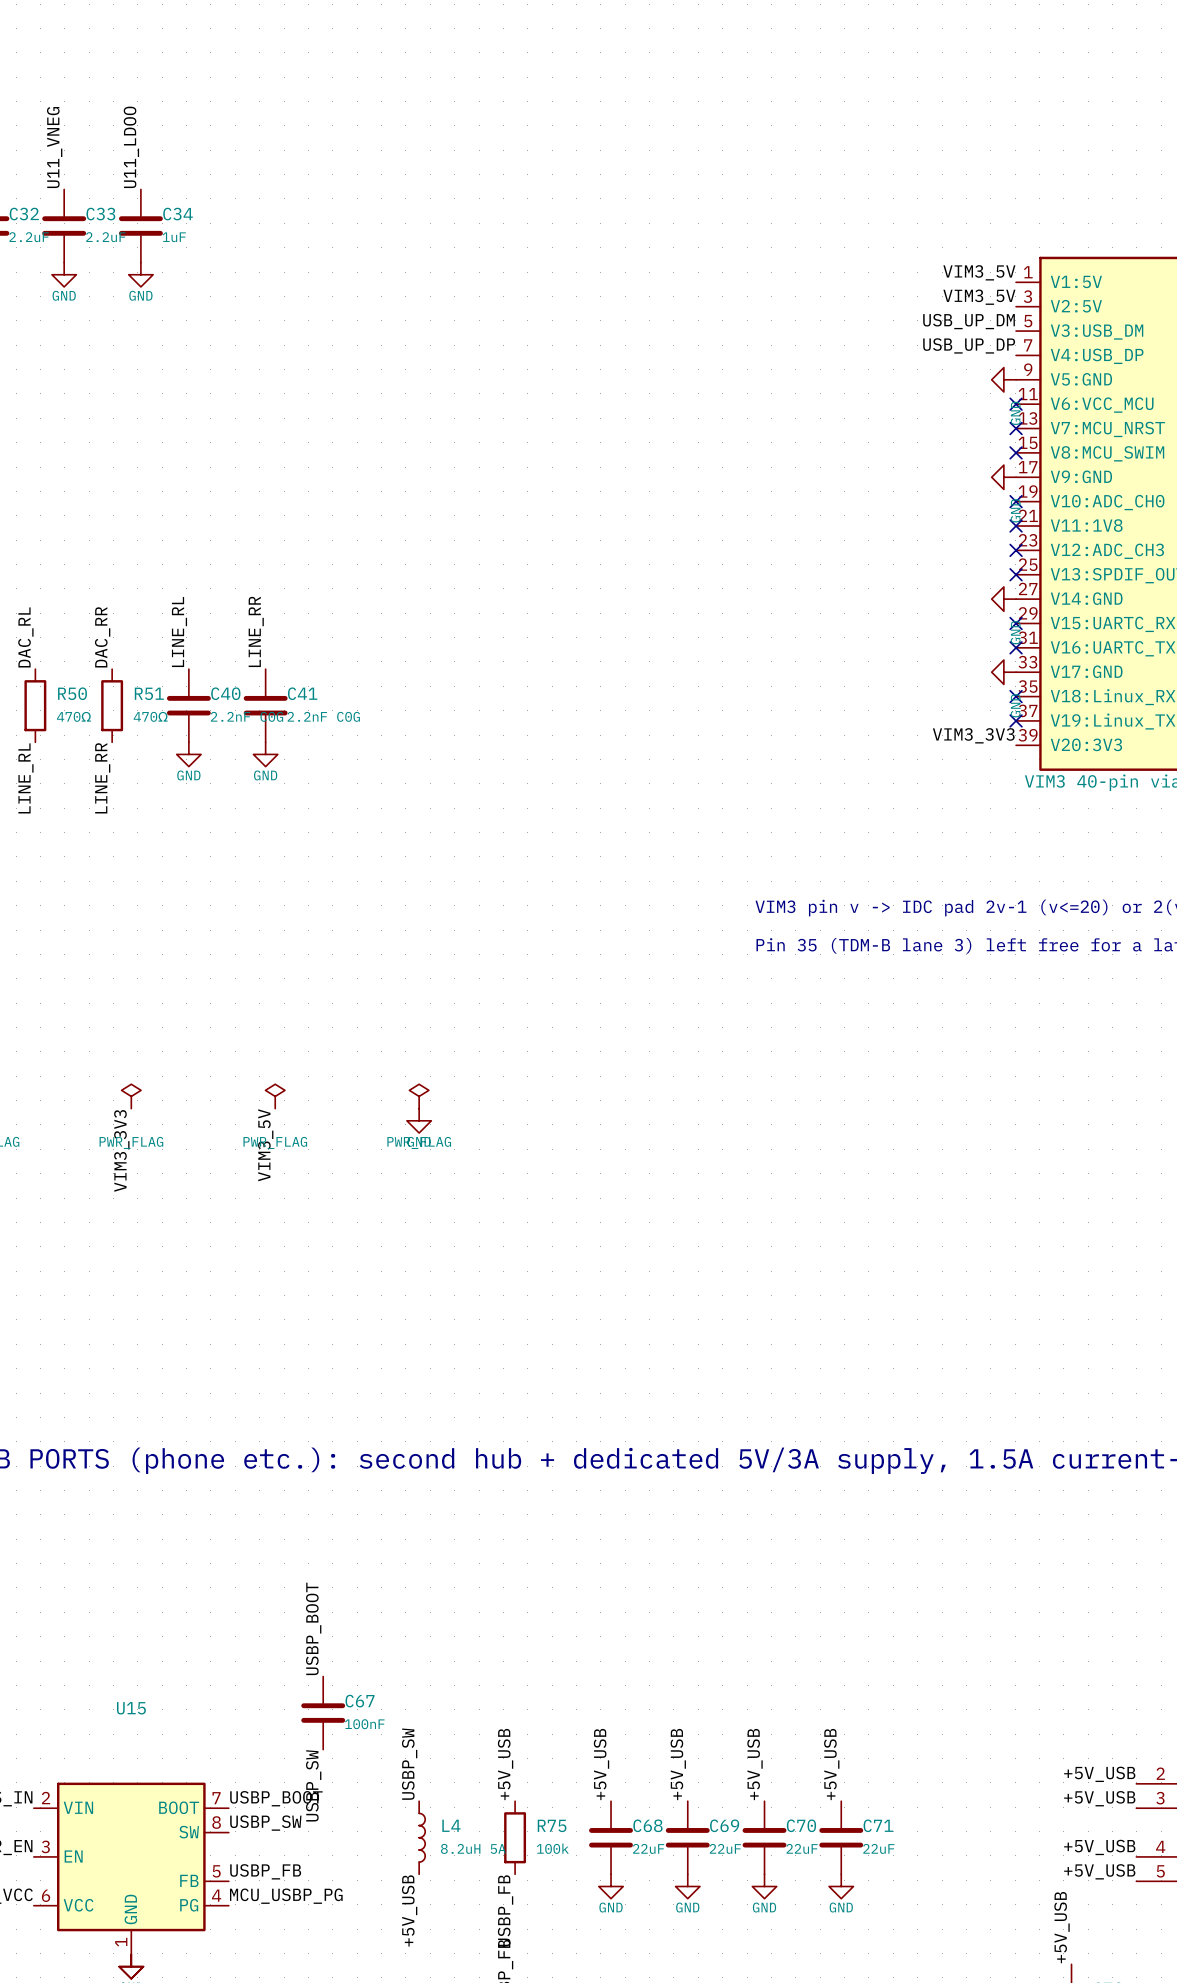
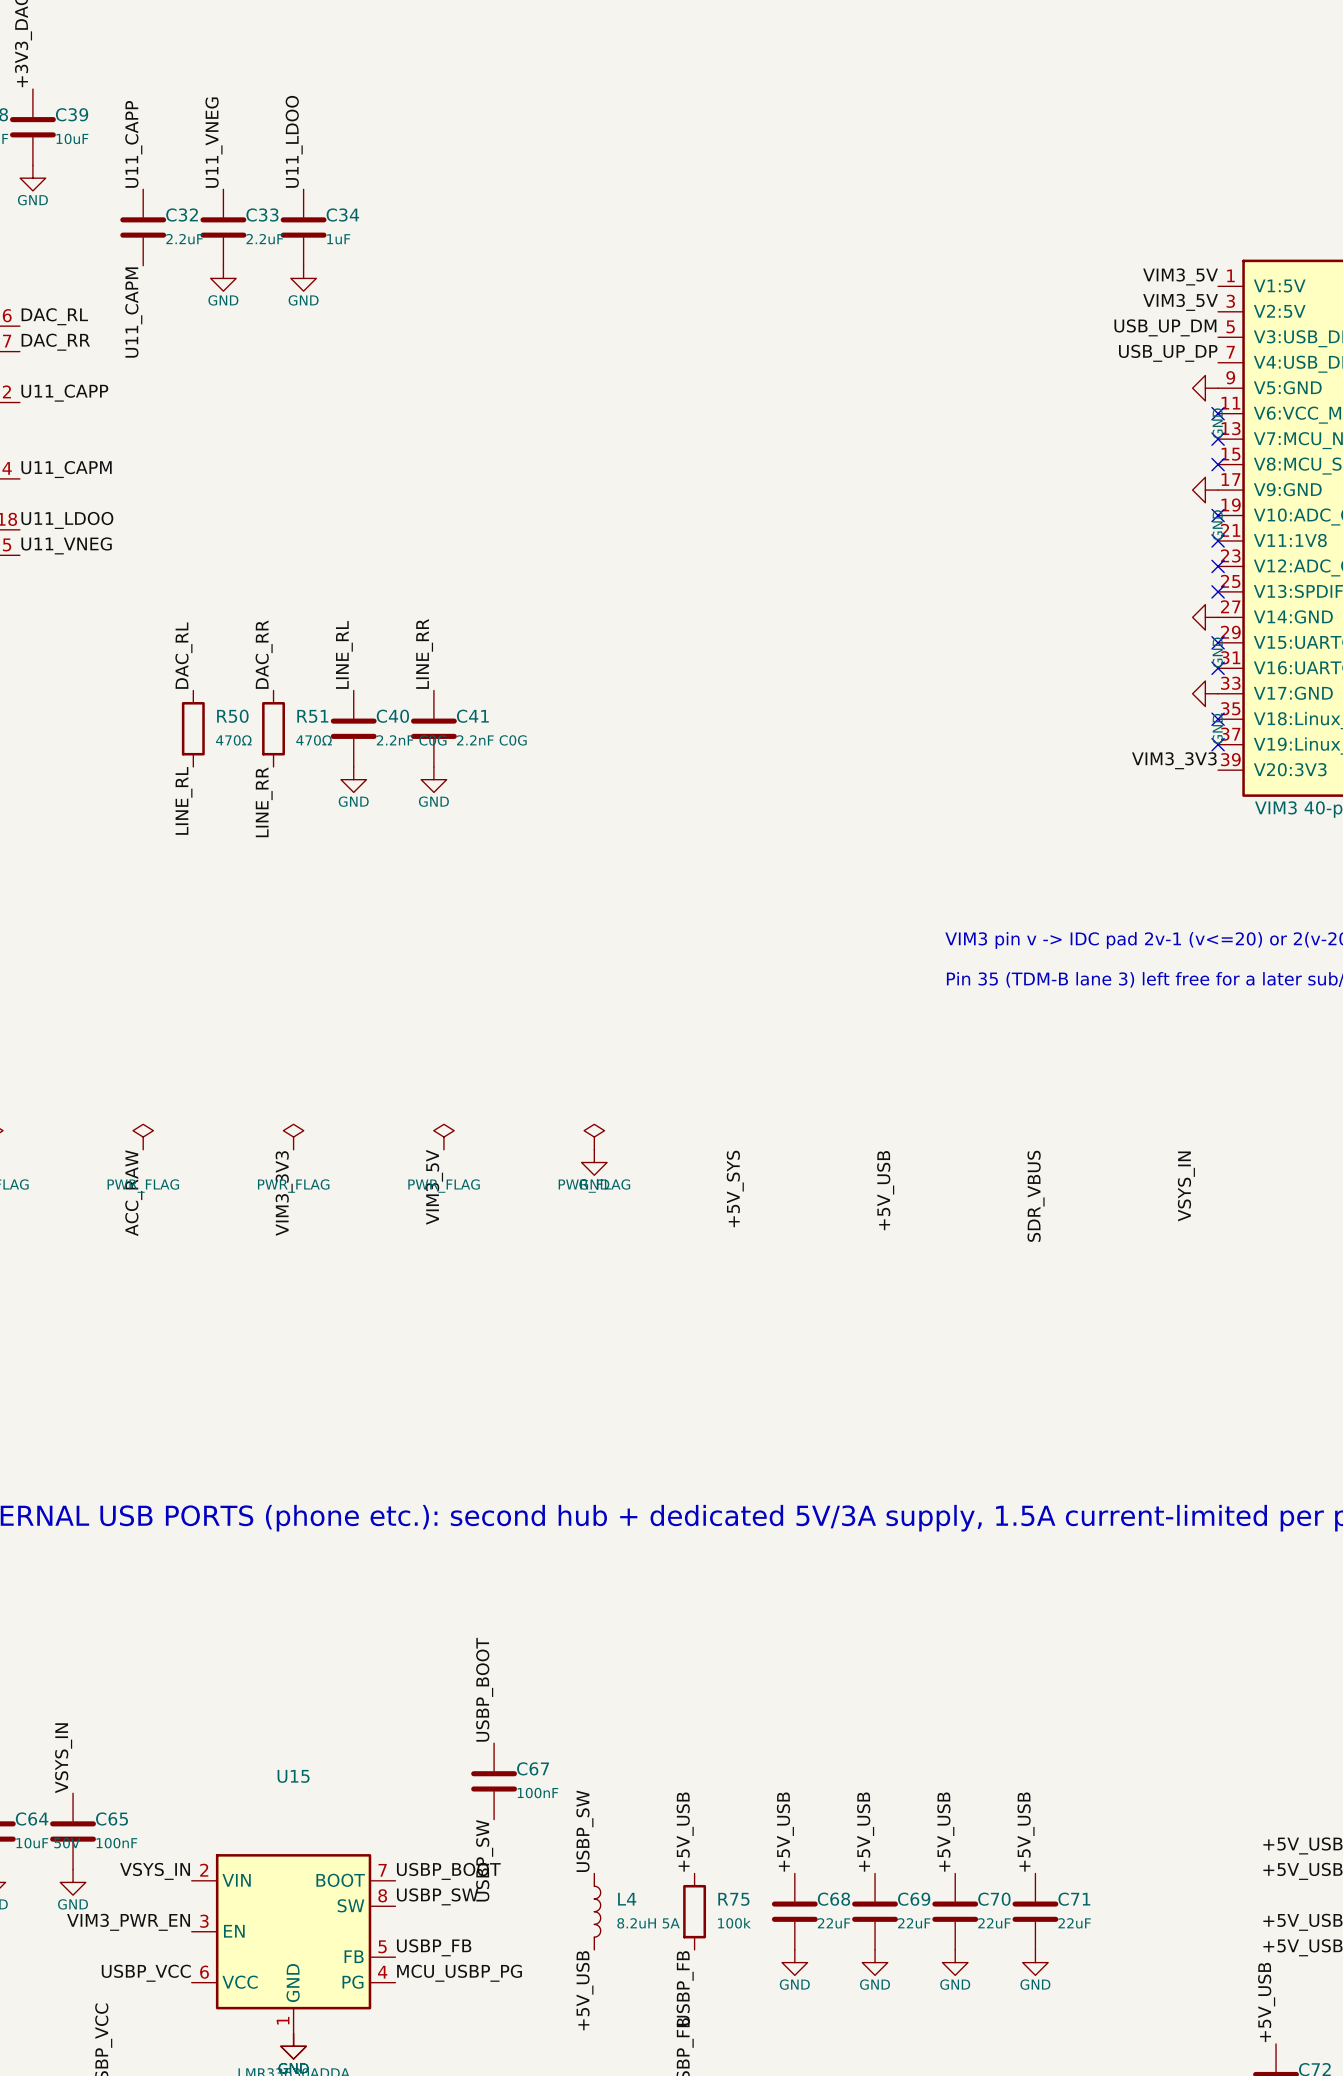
label: none -> +5V_SYS (735, 1188)
label: none -> +5V_USB (885, 1190)
label: none -> VSYS_IN (1186, 1186)
label: none -> SDR_VBUS (1036, 1196)

